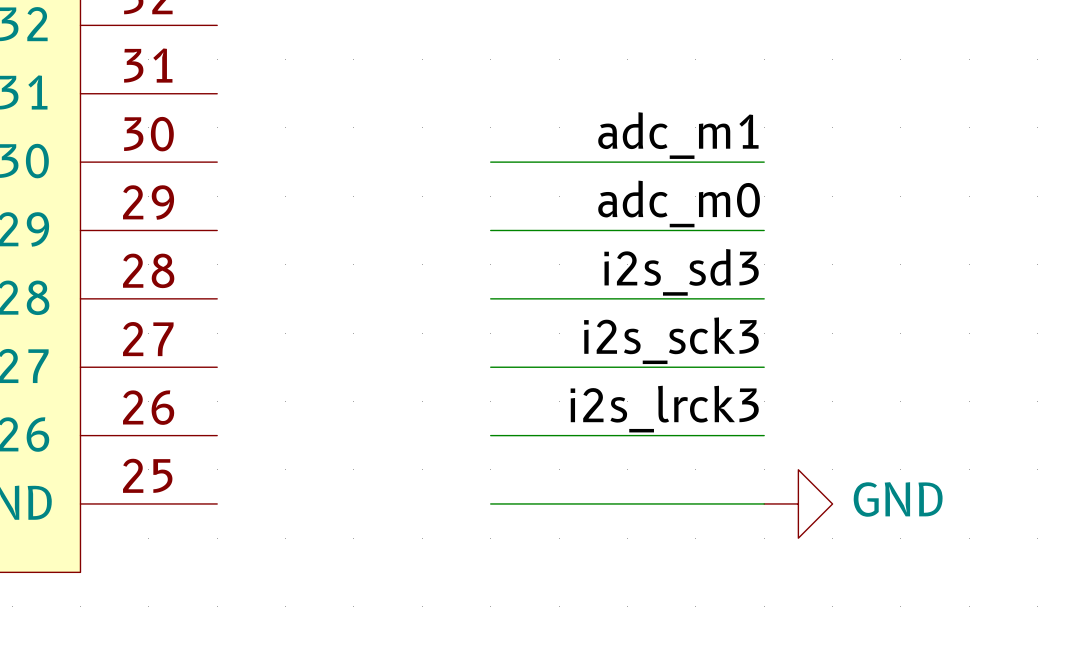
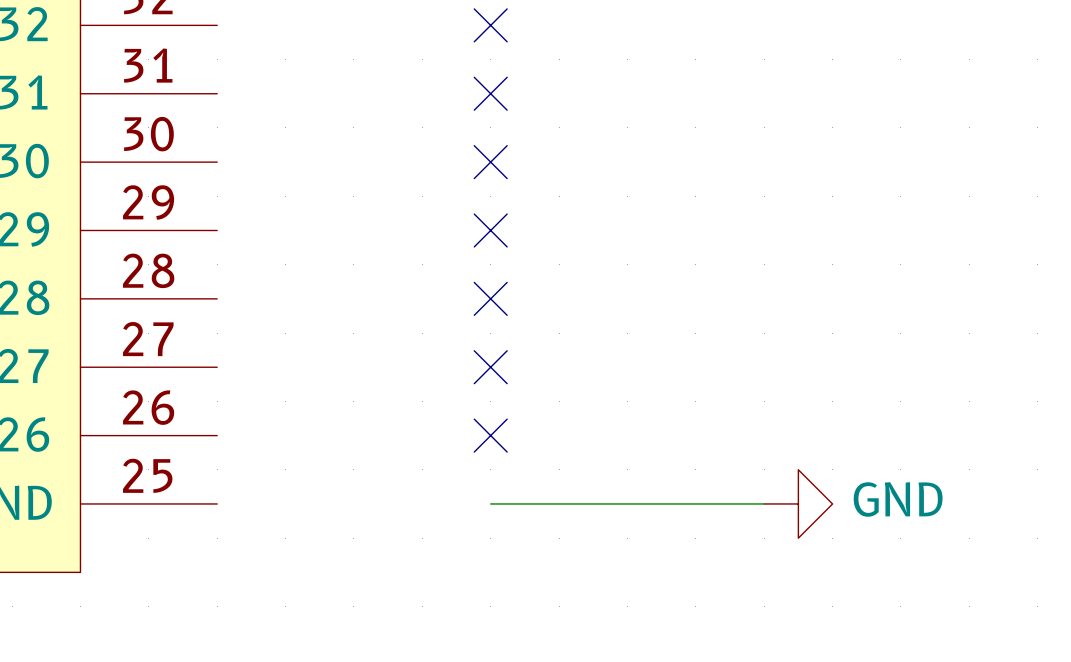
no-connect mark: none -> (490, 25)
no-connect mark: none -> (490, 93)
label: adc_m1 (678, 135) -> none
wire: (490, 162) (764, 162) -> none
no-connect mark: none -> (490, 162)
label: adc_m0 (679, 203) -> none
wire: (490, 230) (764, 230) -> none
no-connect mark: none -> (490, 230)
label: i2s_sd3 (681, 272) -> none
wire: (490, 298) (764, 298) -> none
no-connect mark: none -> (490, 298)
label: i2s_sck3 (671, 340) -> none
wire: (490, 367) (764, 367) -> none
no-connect mark: none -> (490, 367)
label: i2s_lrck3 (664, 409) -> none
wire: (490, 435) (764, 435) -> none
no-connect mark: none -> (490, 435)

